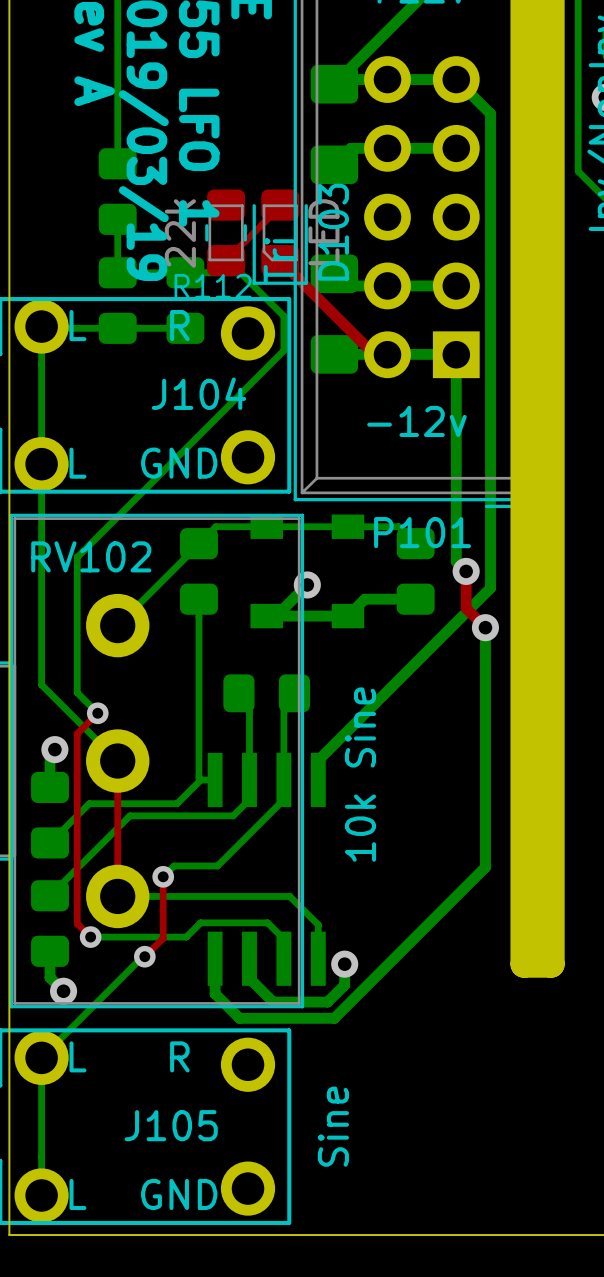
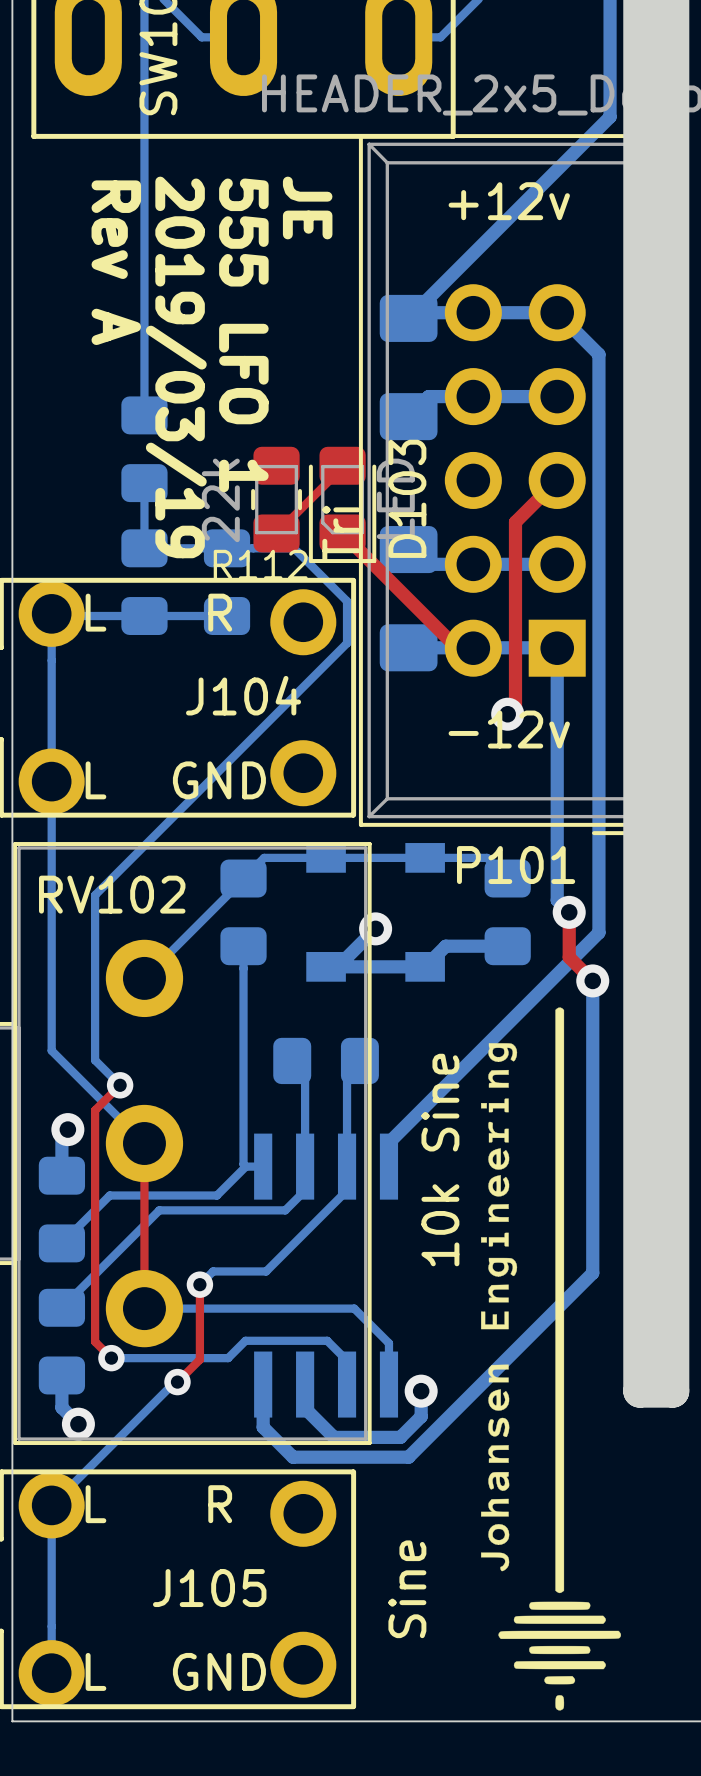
top track: none -> (557, 480) (515, 522) (515, 706) (507, 714)
via: none -> (507, 714)
drawing: none -> [481, 1007, 621, 1711]

